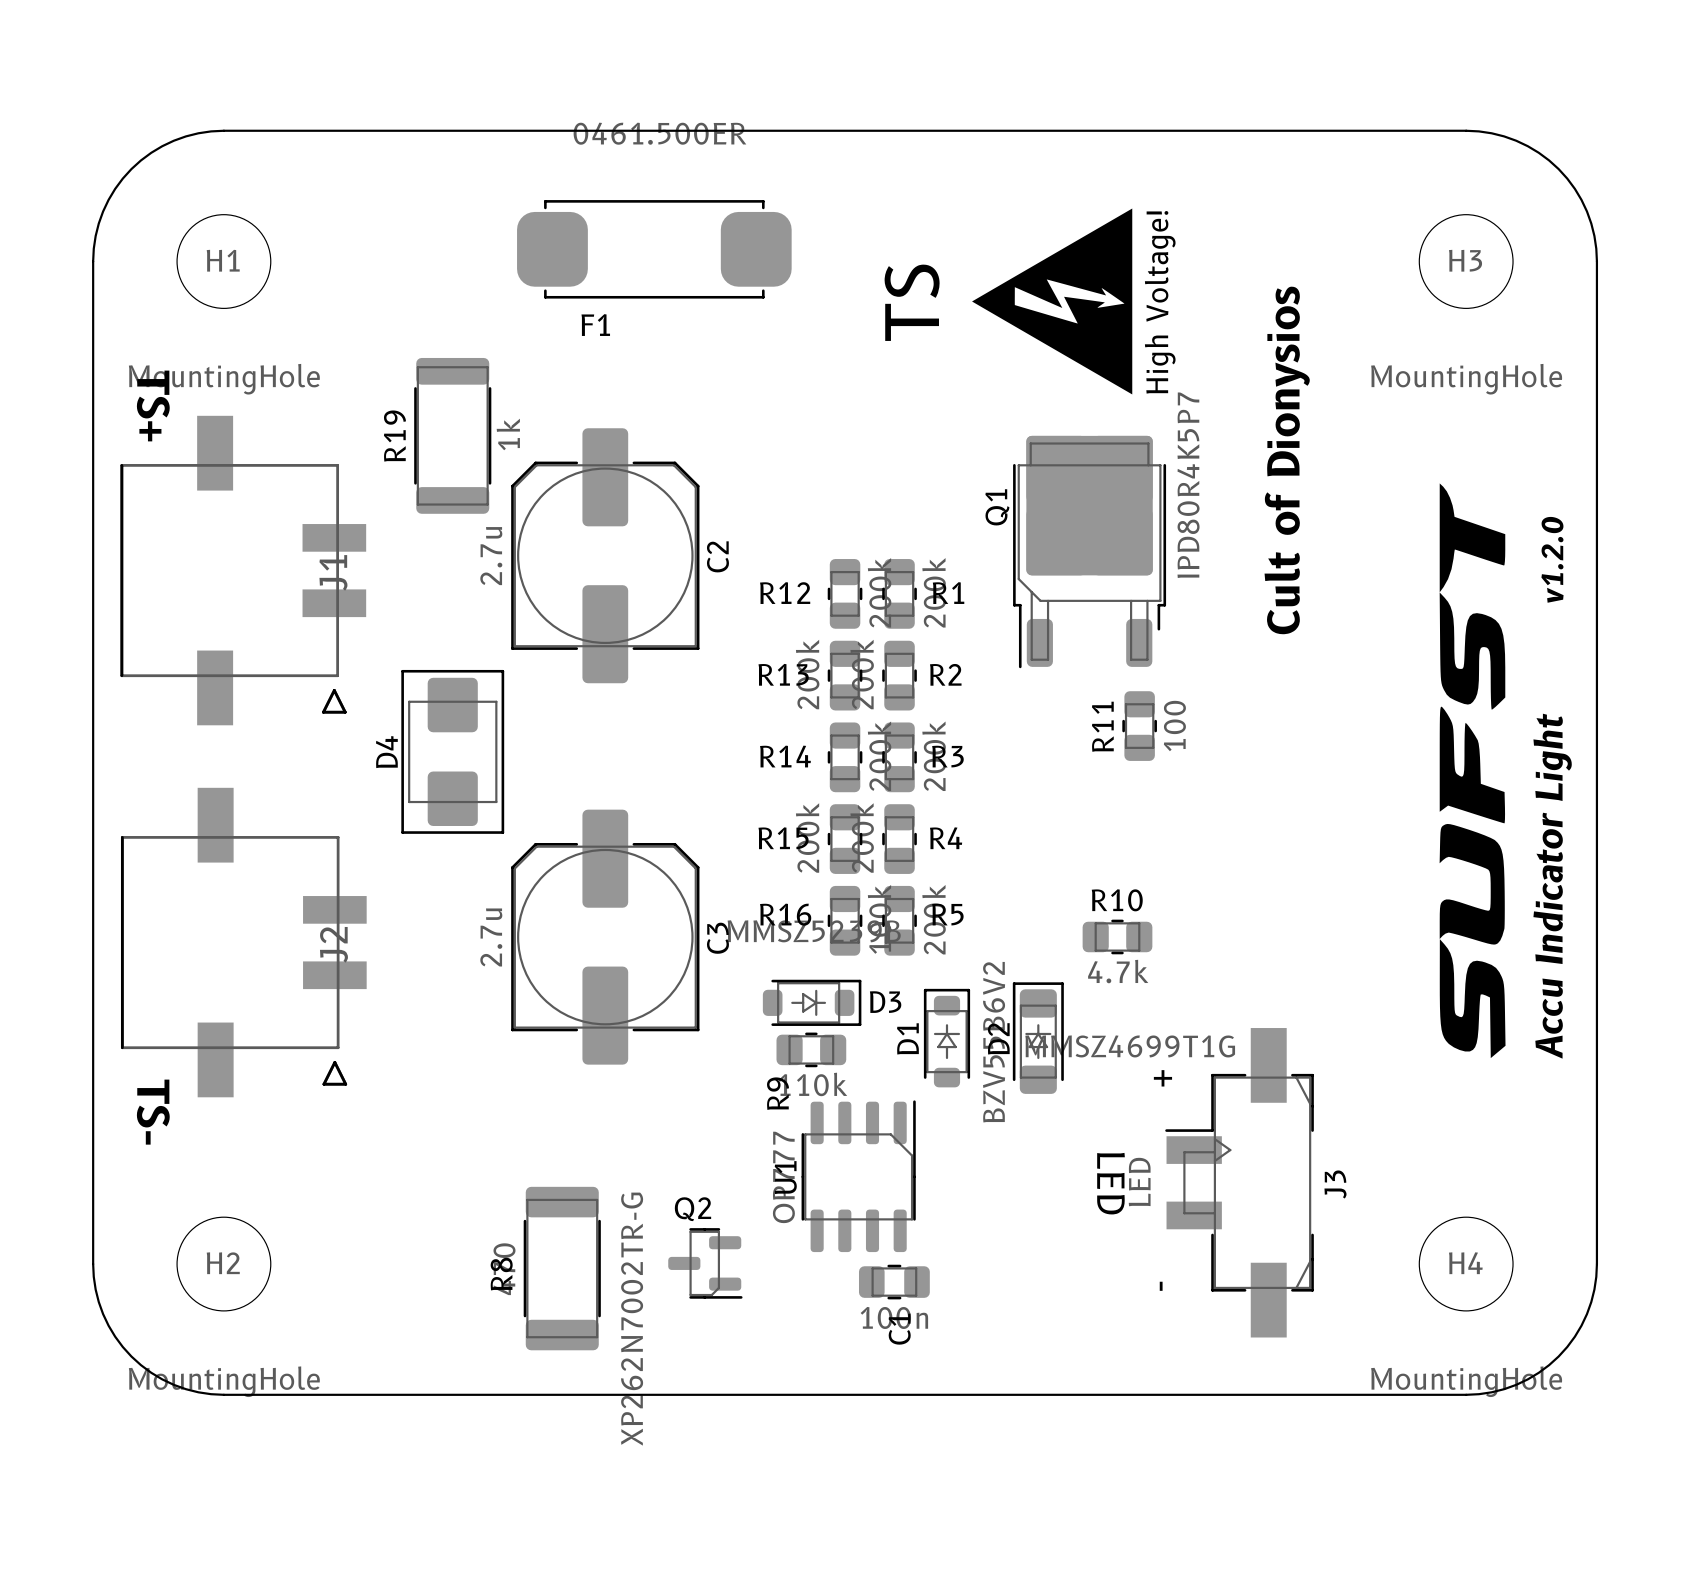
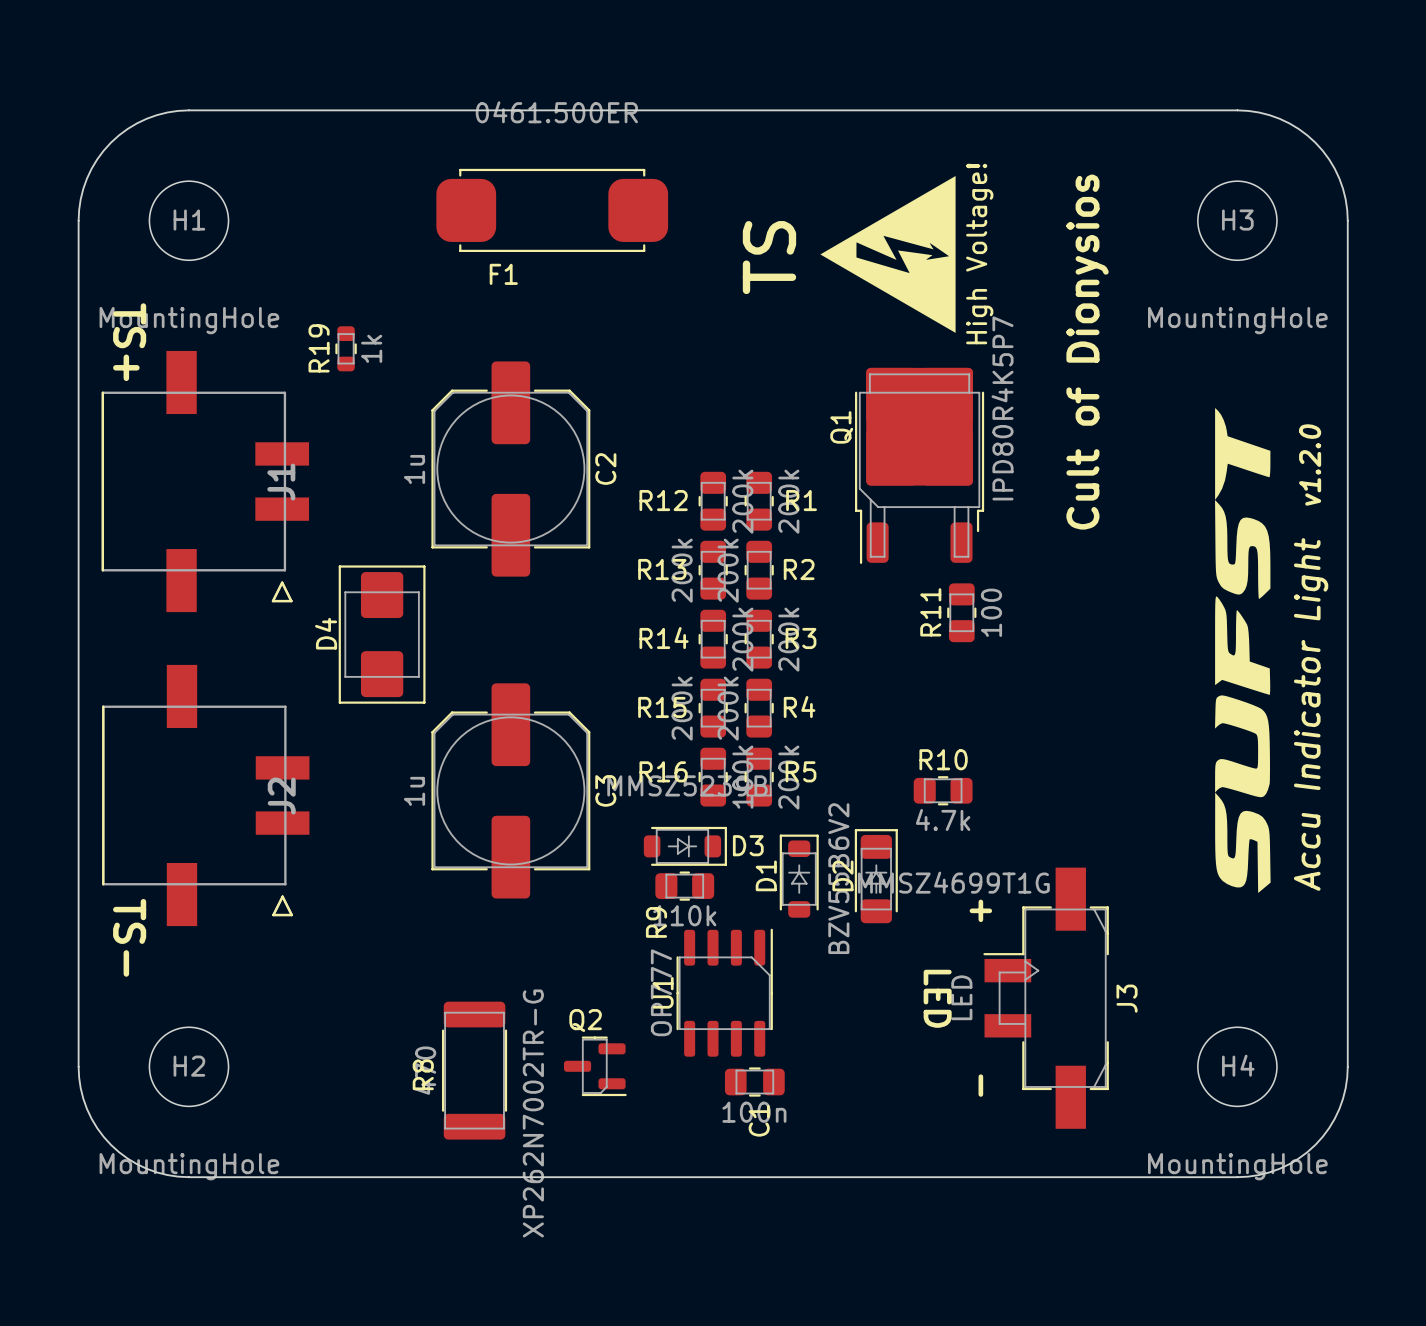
R19 footprint: [414, 357, 492, 514] -> [335, 326, 357, 372]
C2 value: 2.7u (491, 556) -> 1u (414, 469)
C3 value: 2.7u (491, 937) -> 1u (414, 791)

